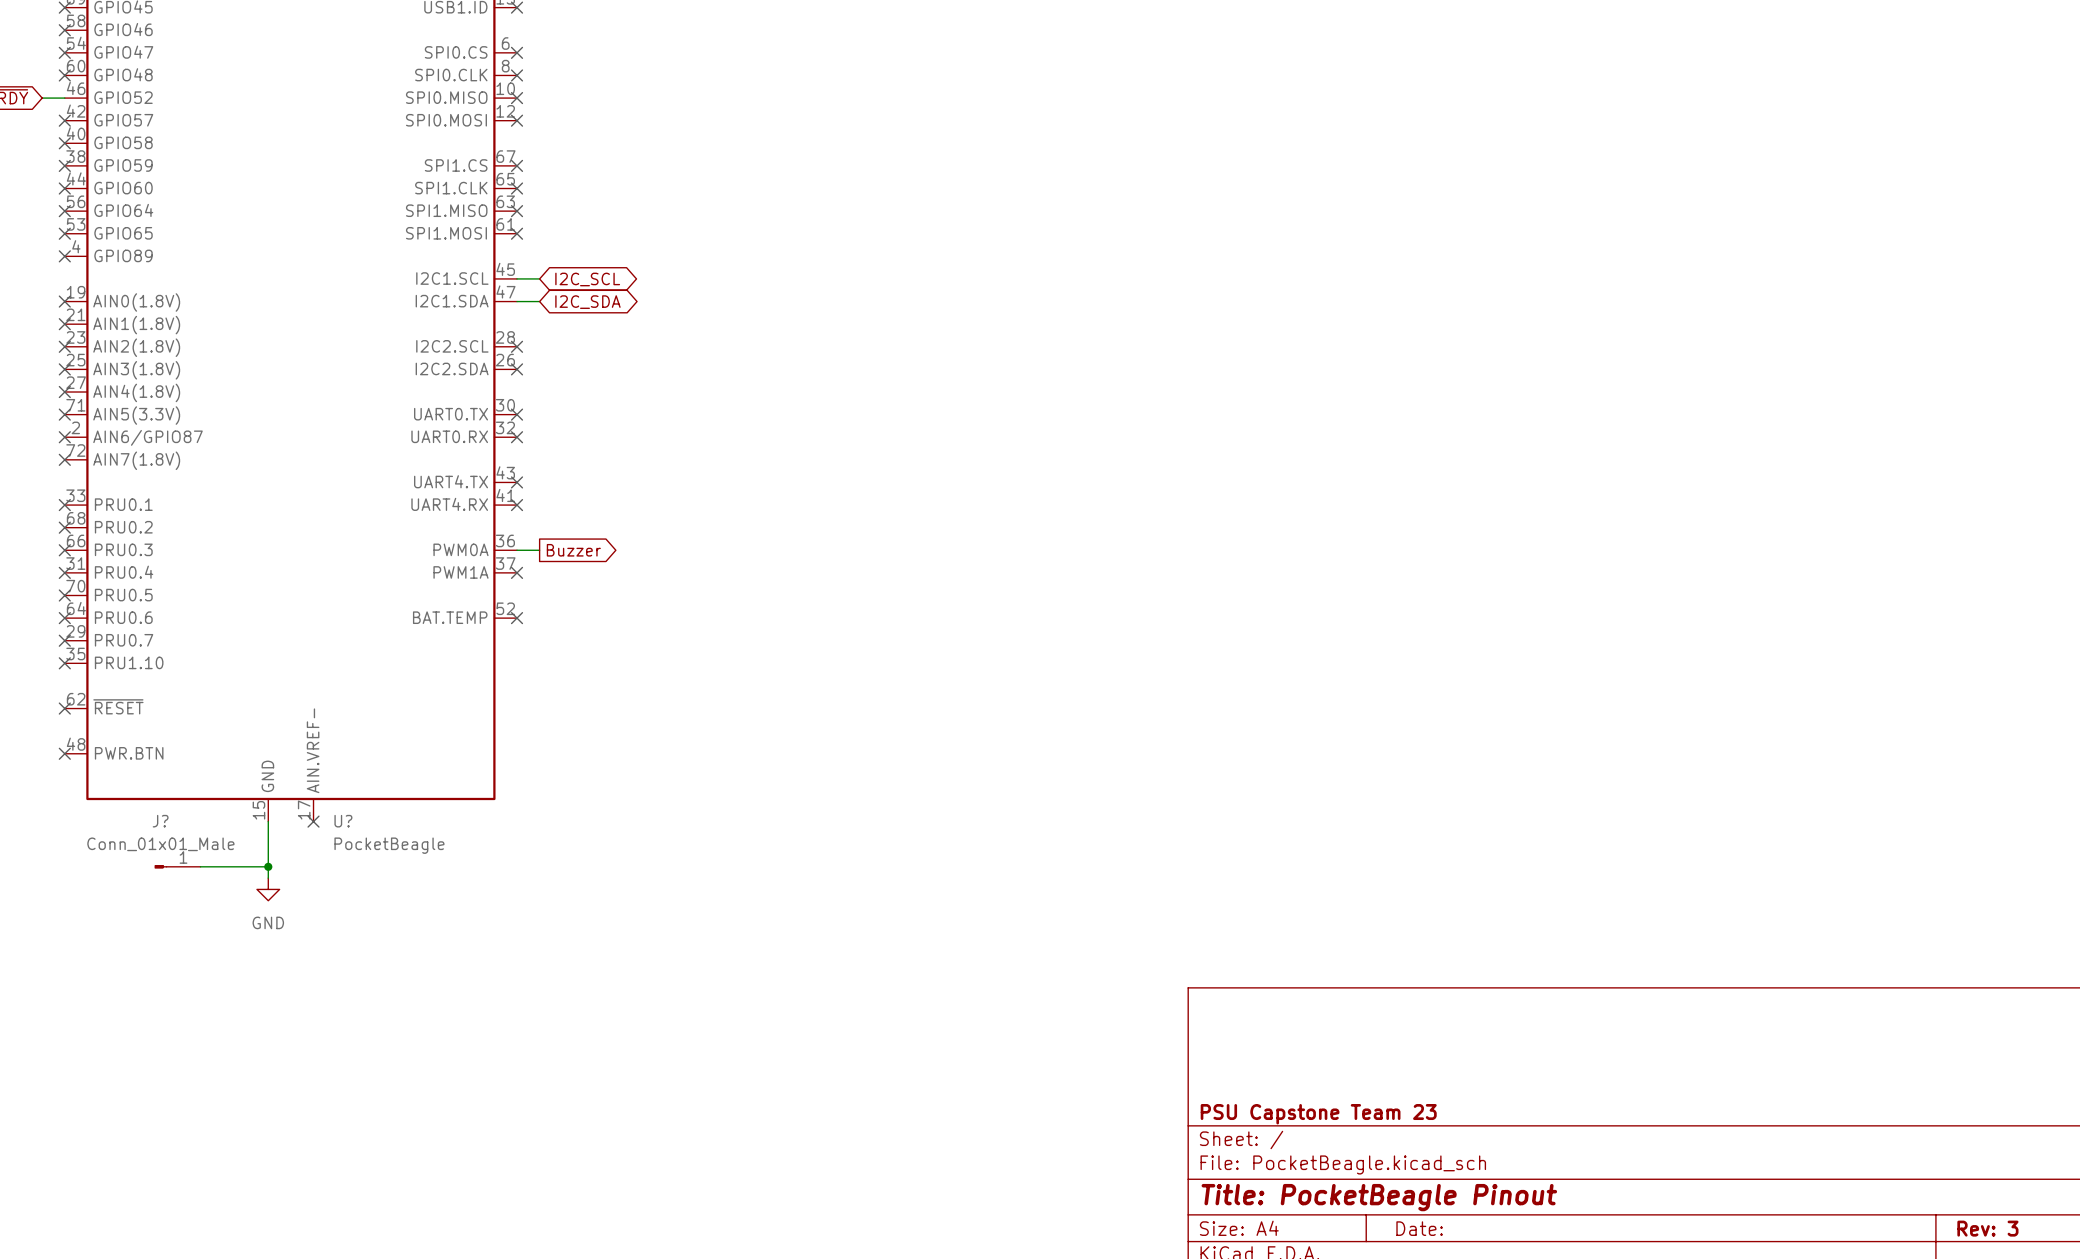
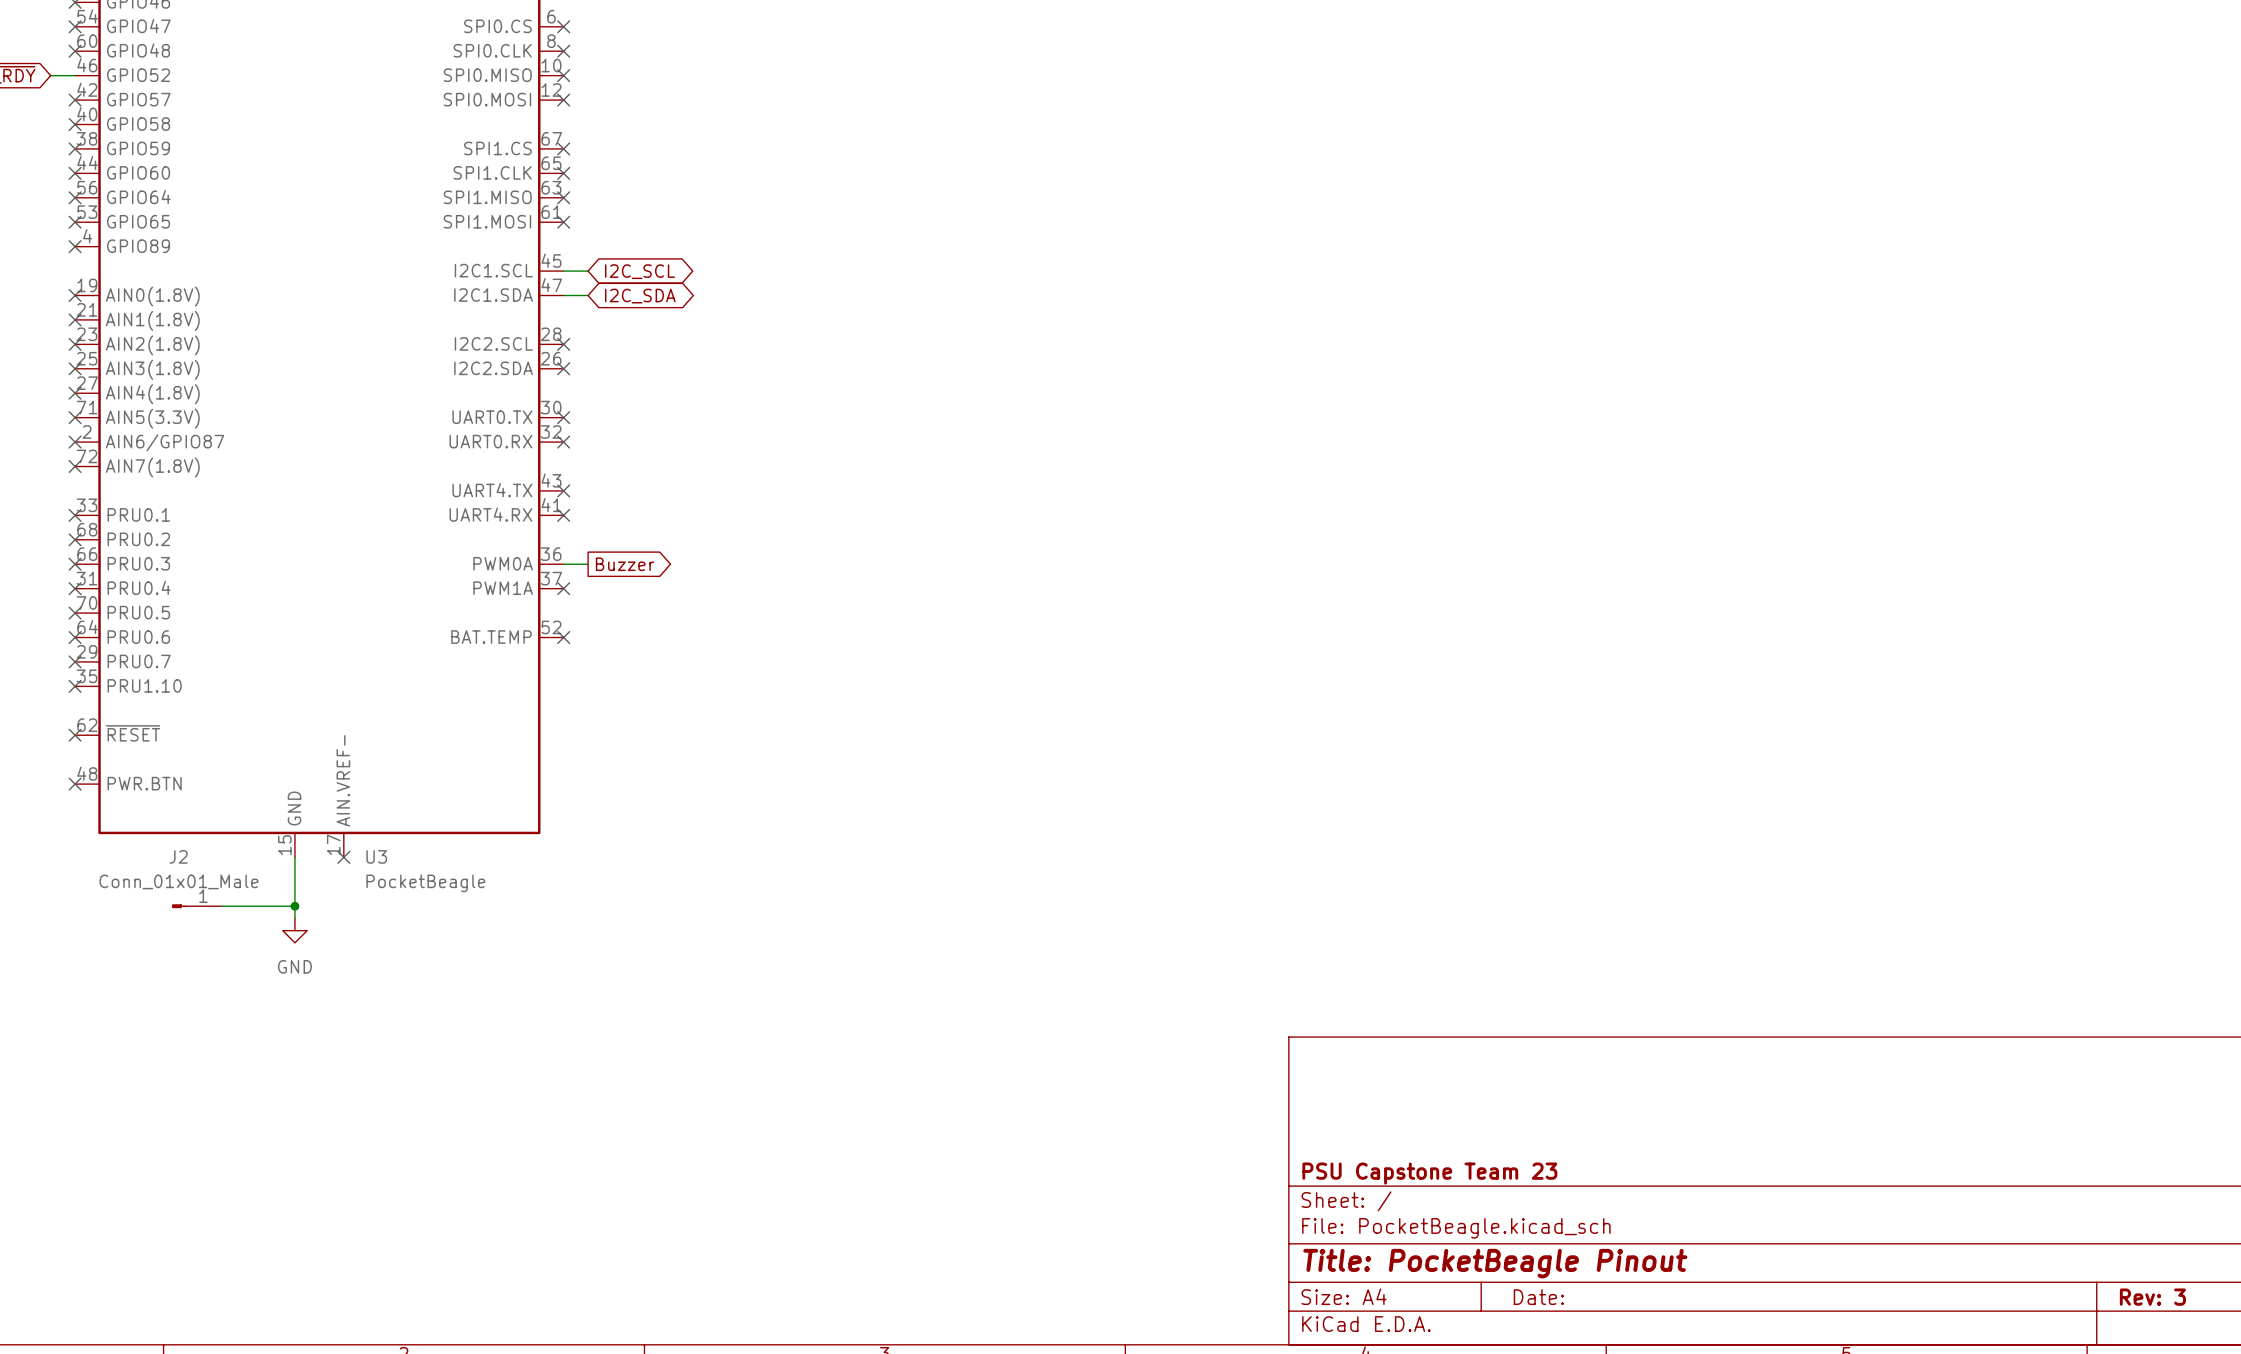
J? name: J? (160, 821) -> J2 (178, 856)
U? name: U? (343, 821) -> U3 (376, 856)

